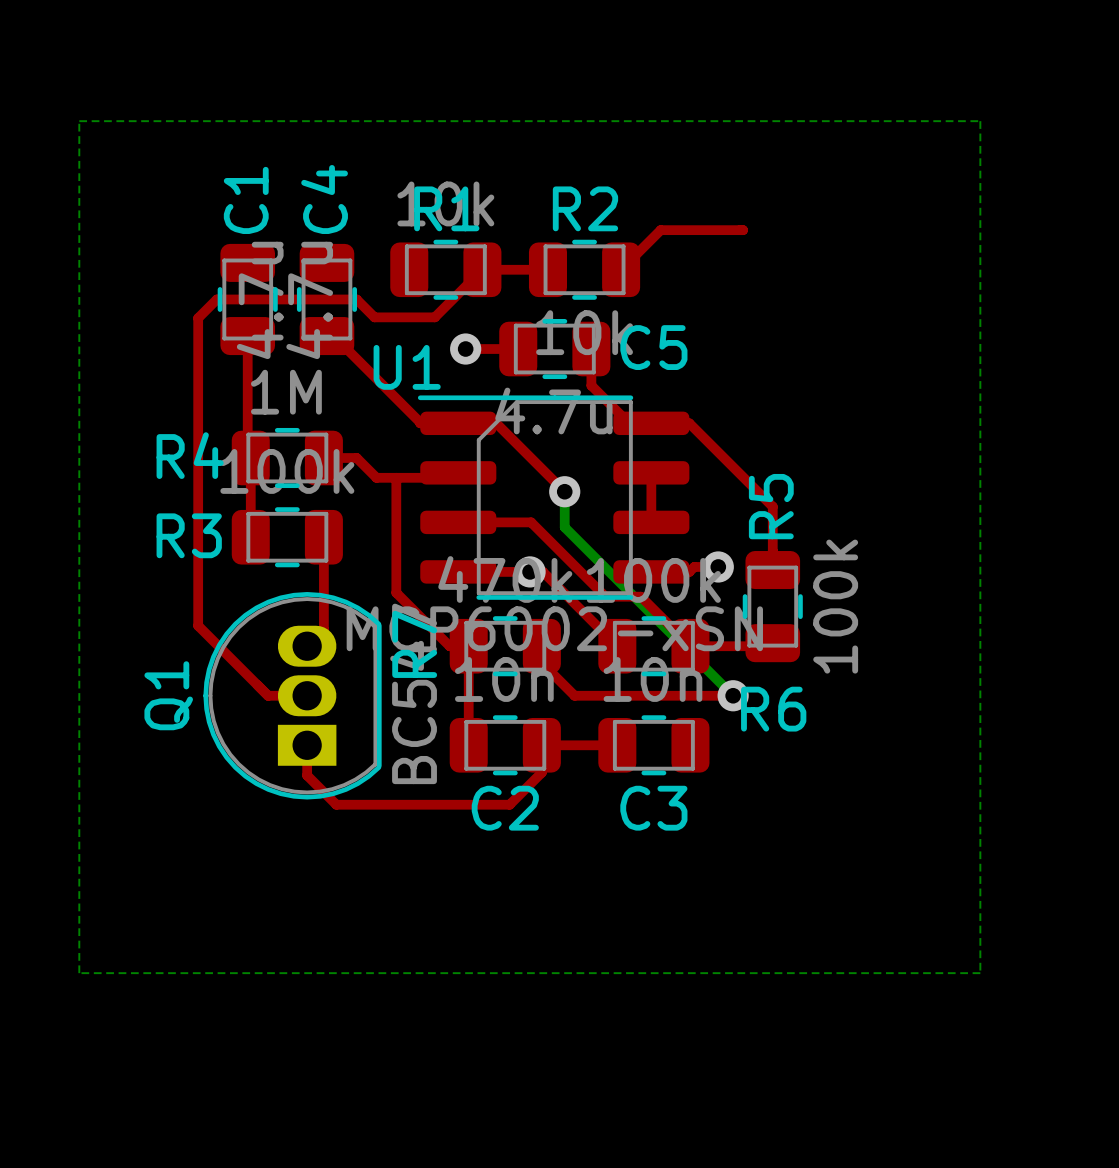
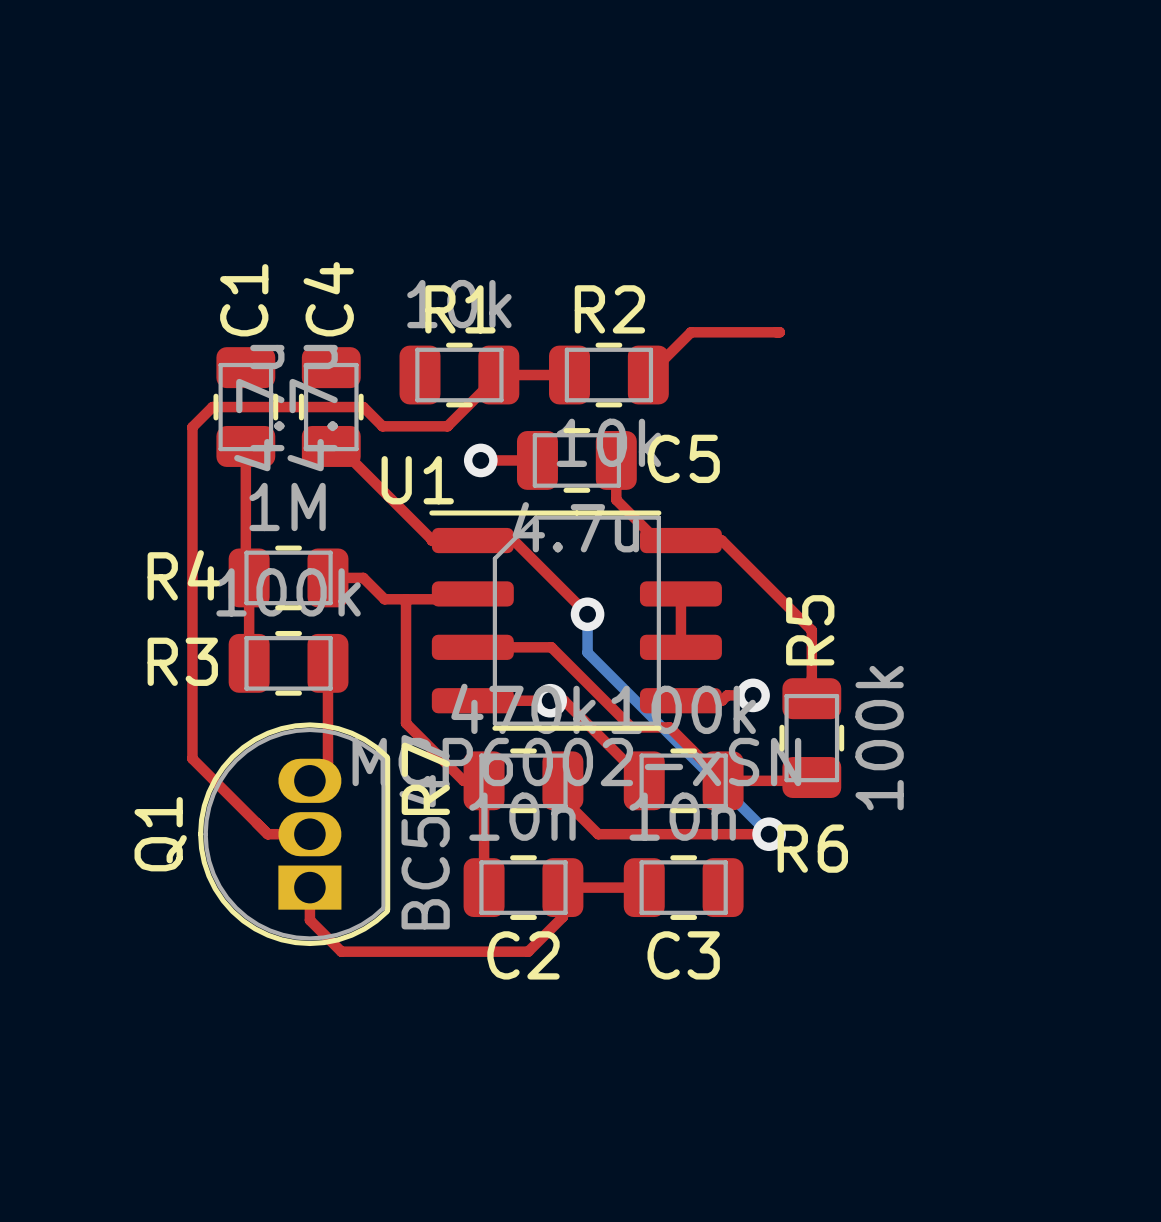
bottom zone outline: (79, 121) (79, 973) (980, 973) (980, 121) (79, 121) -> none

